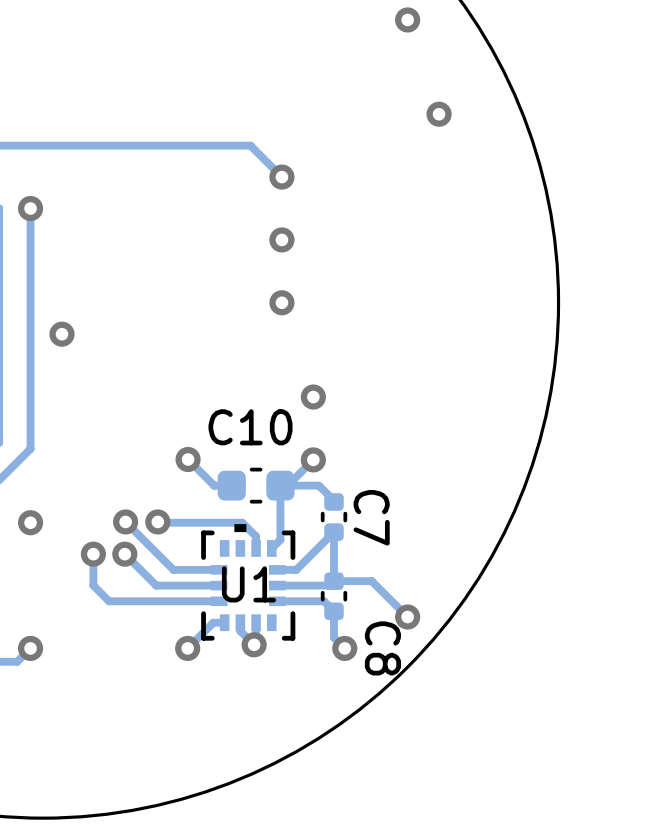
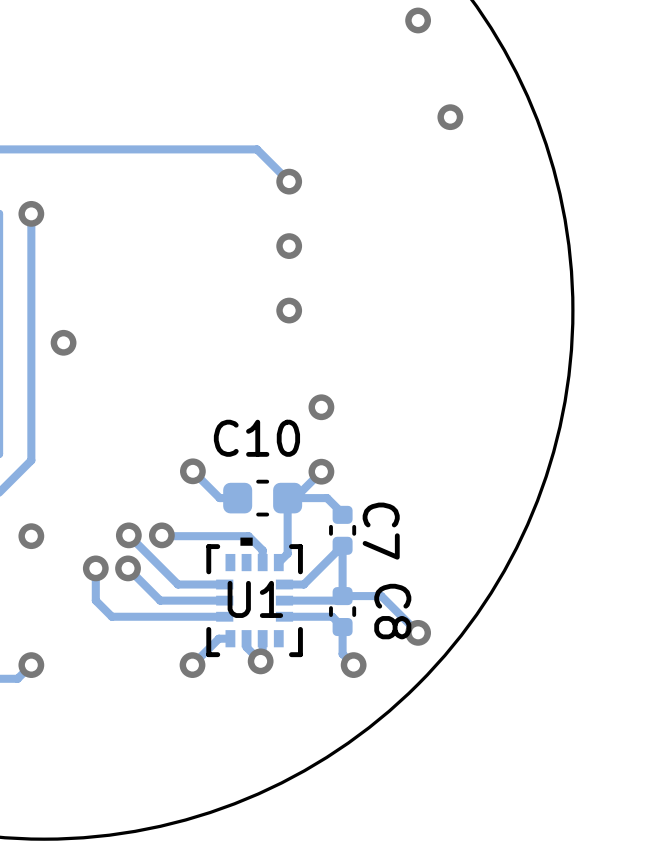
C8 name position: C8 (382, 648) -> C8 (392, 611)

